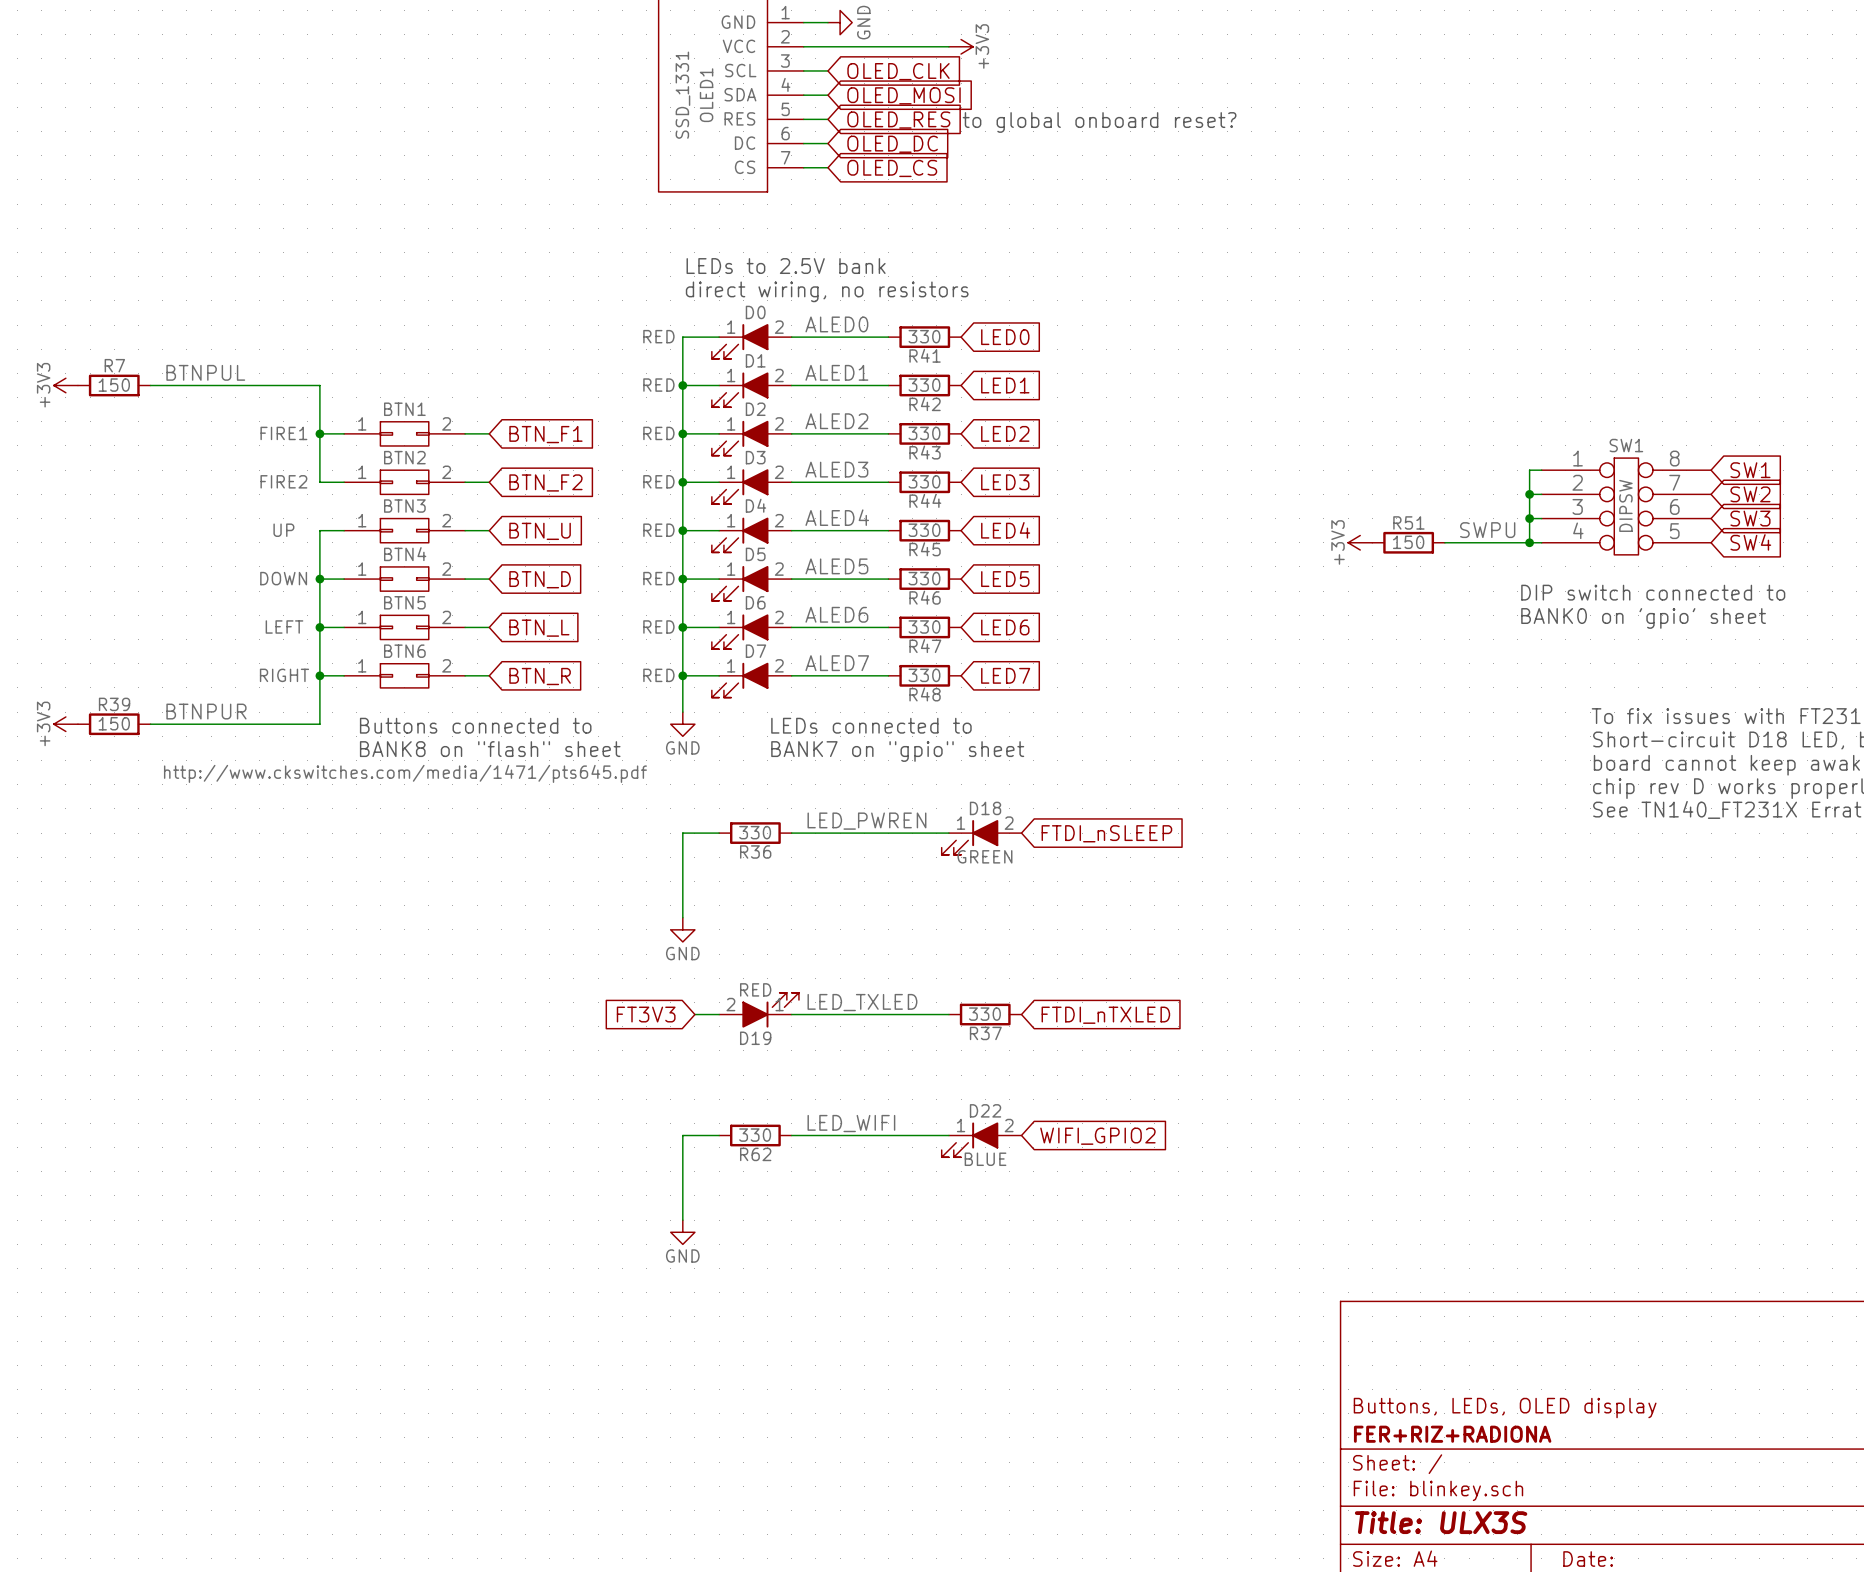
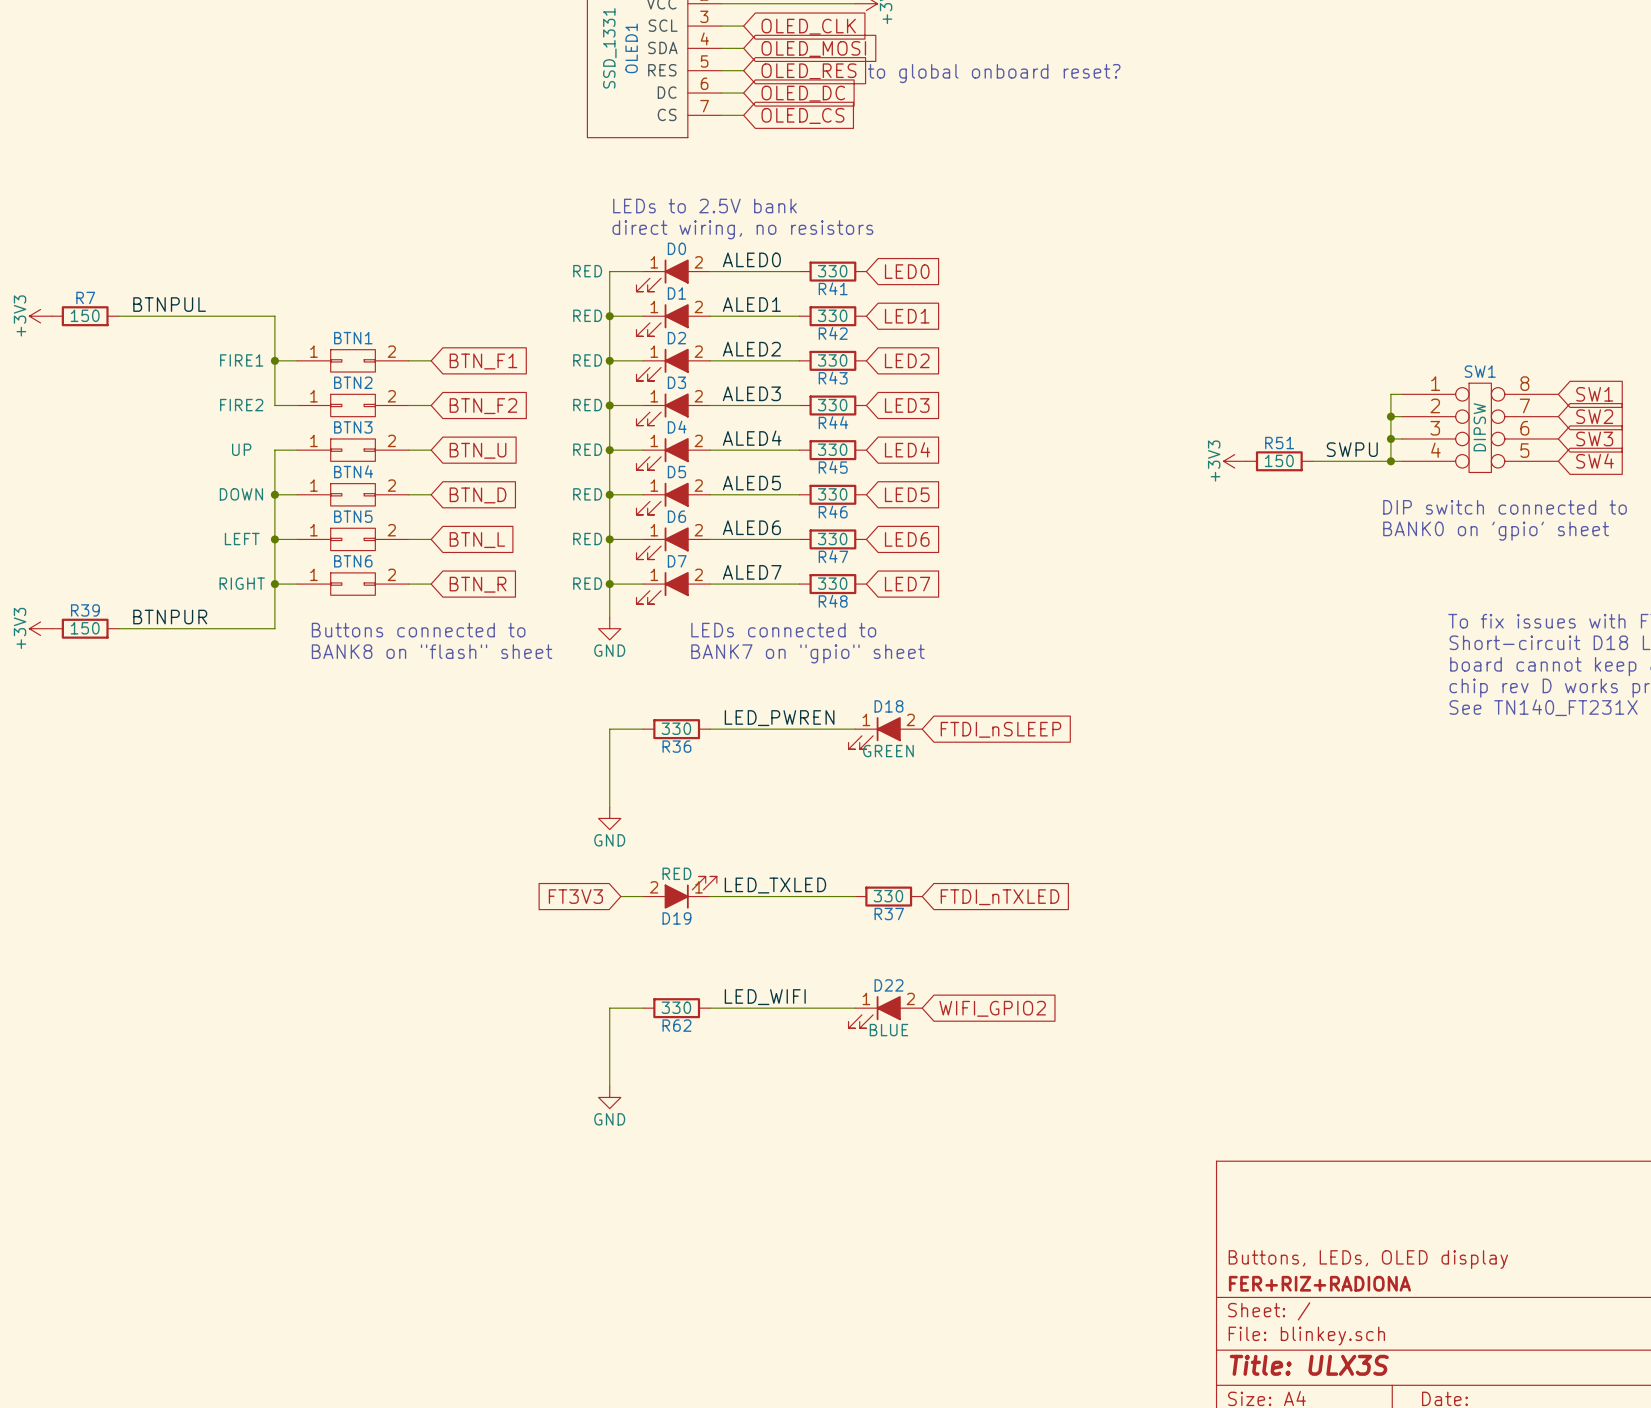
BTN2 text: http://www.ckswitches.com/media/1471/pts645.pdf (405, 773) -> none

